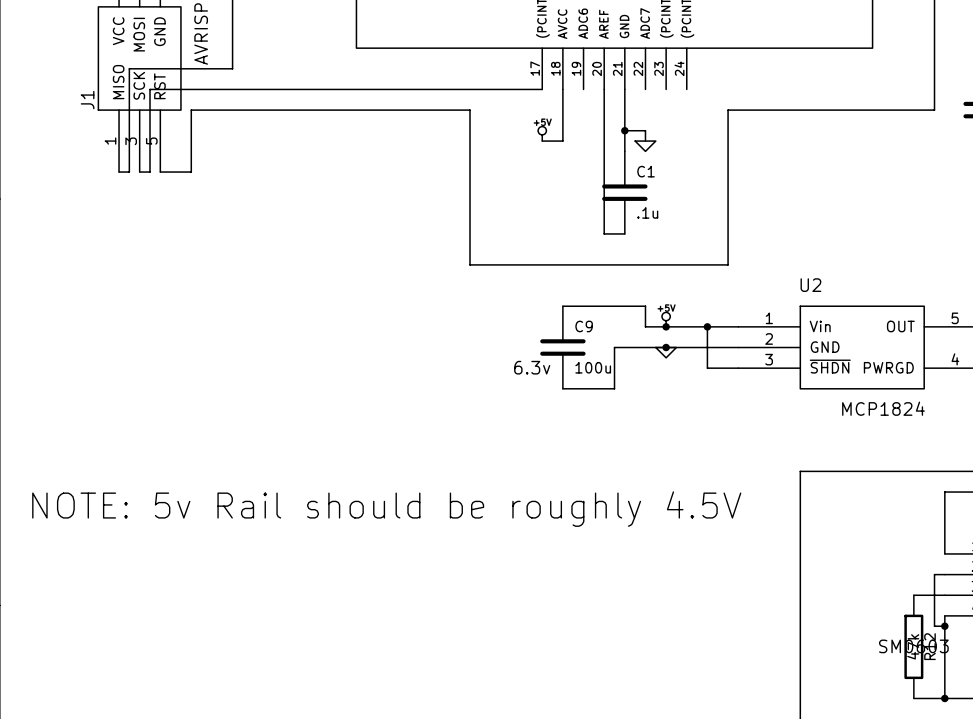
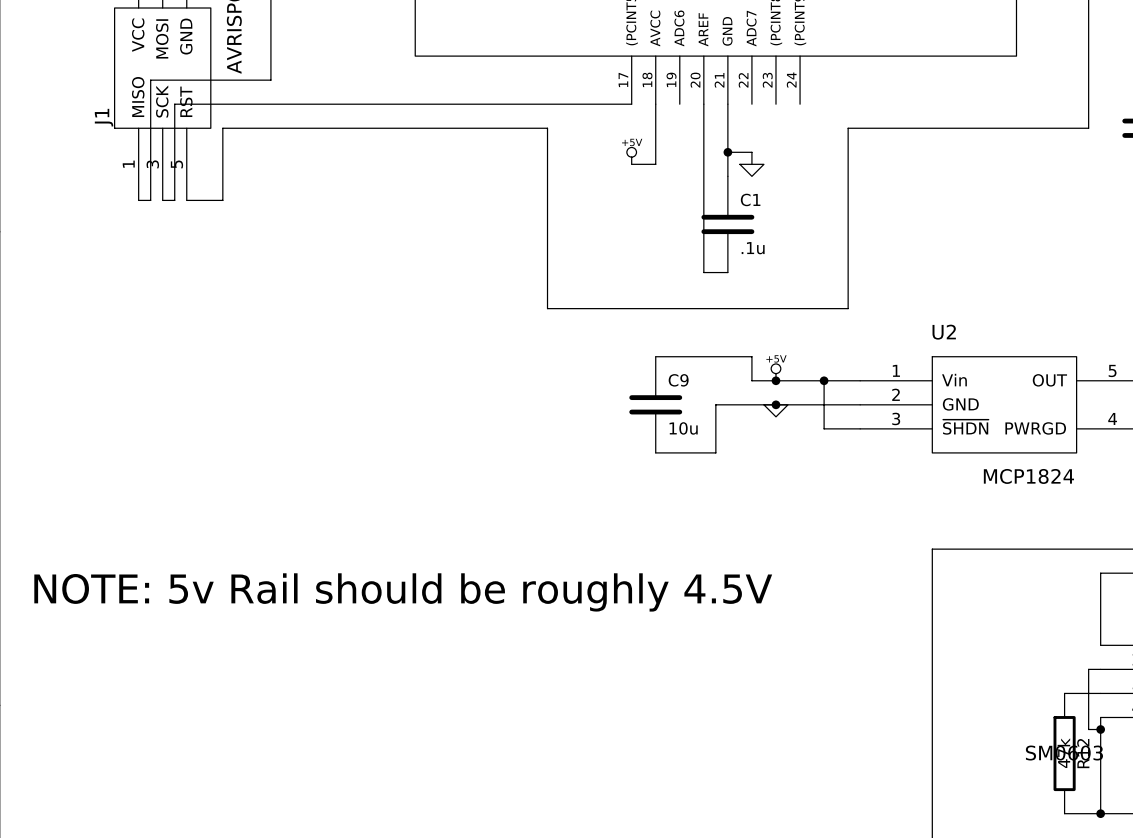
C9 text: 6.3v (532, 367) -> none
C9 value: 100u (593, 367) -> 10u (683, 428)

